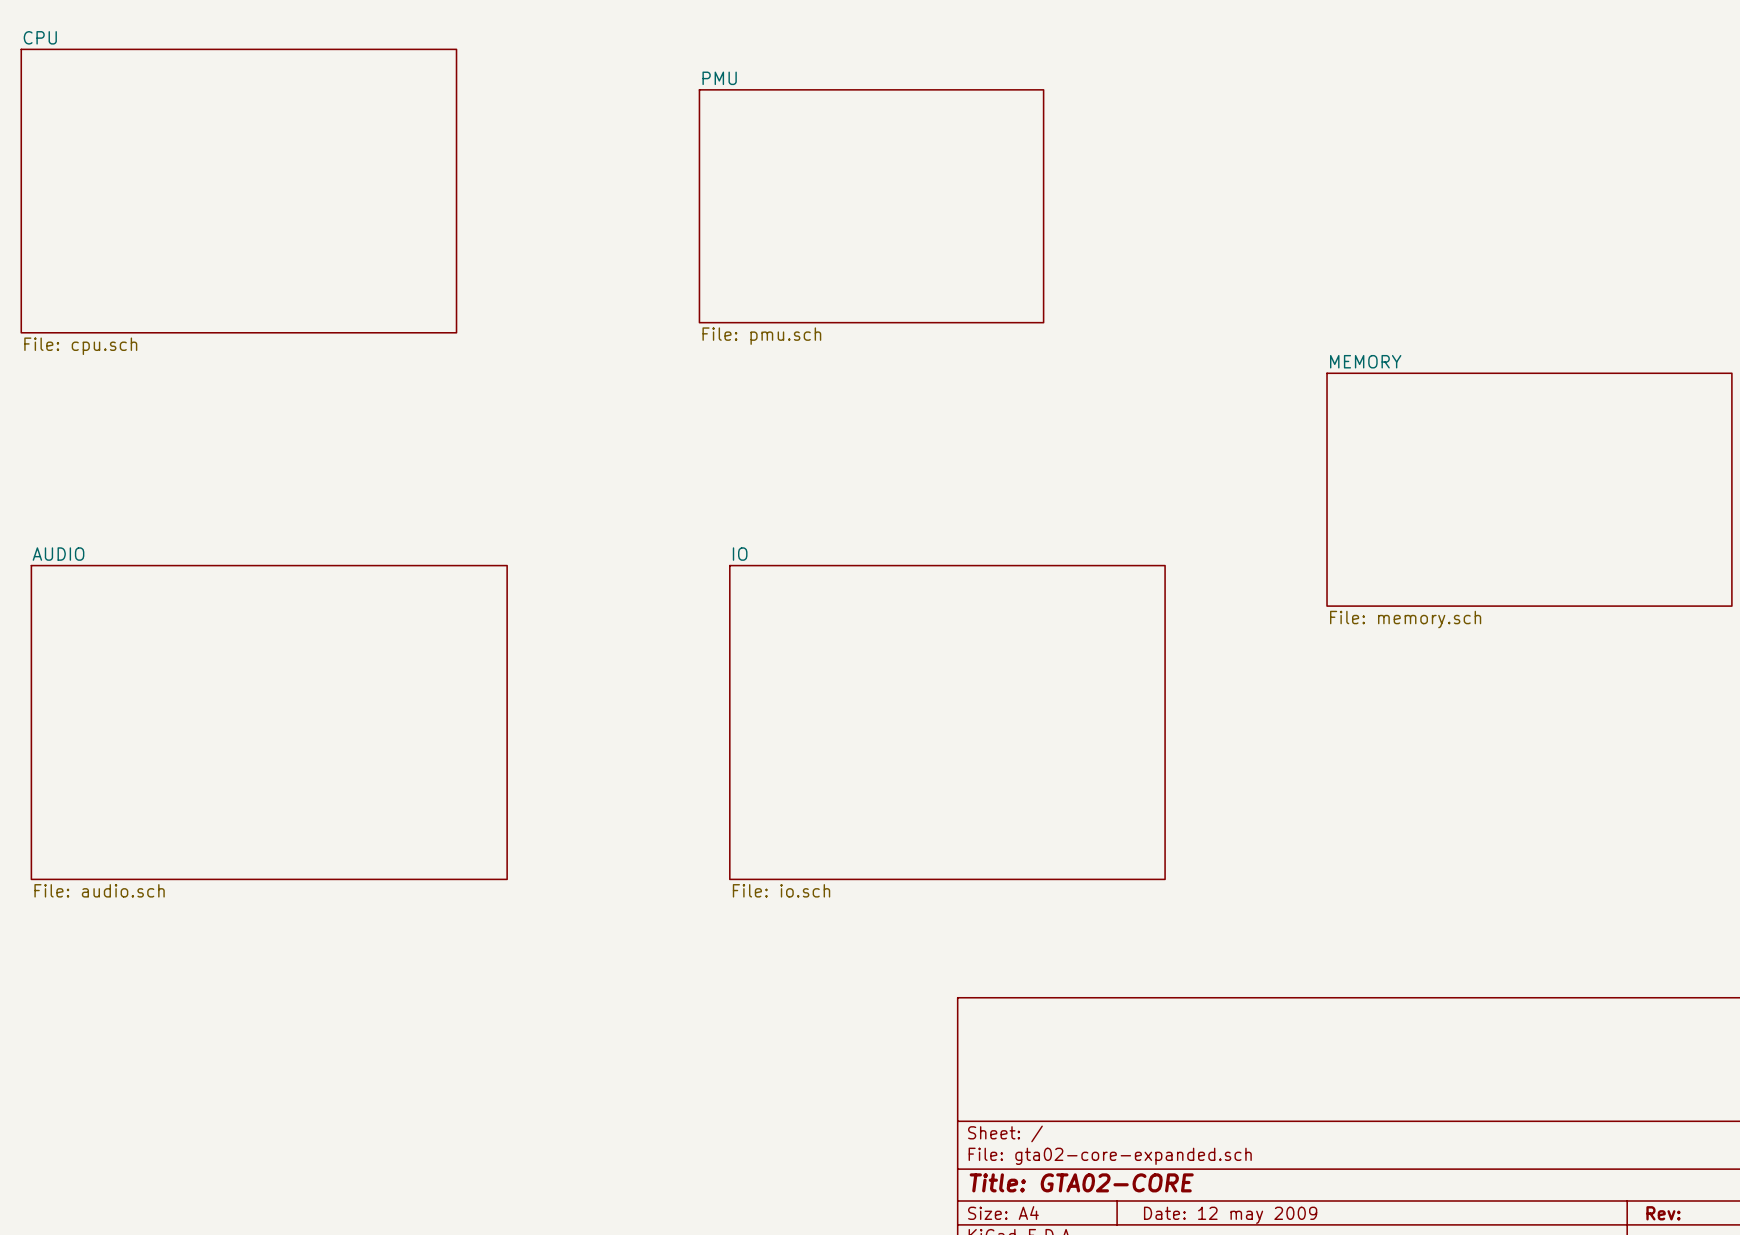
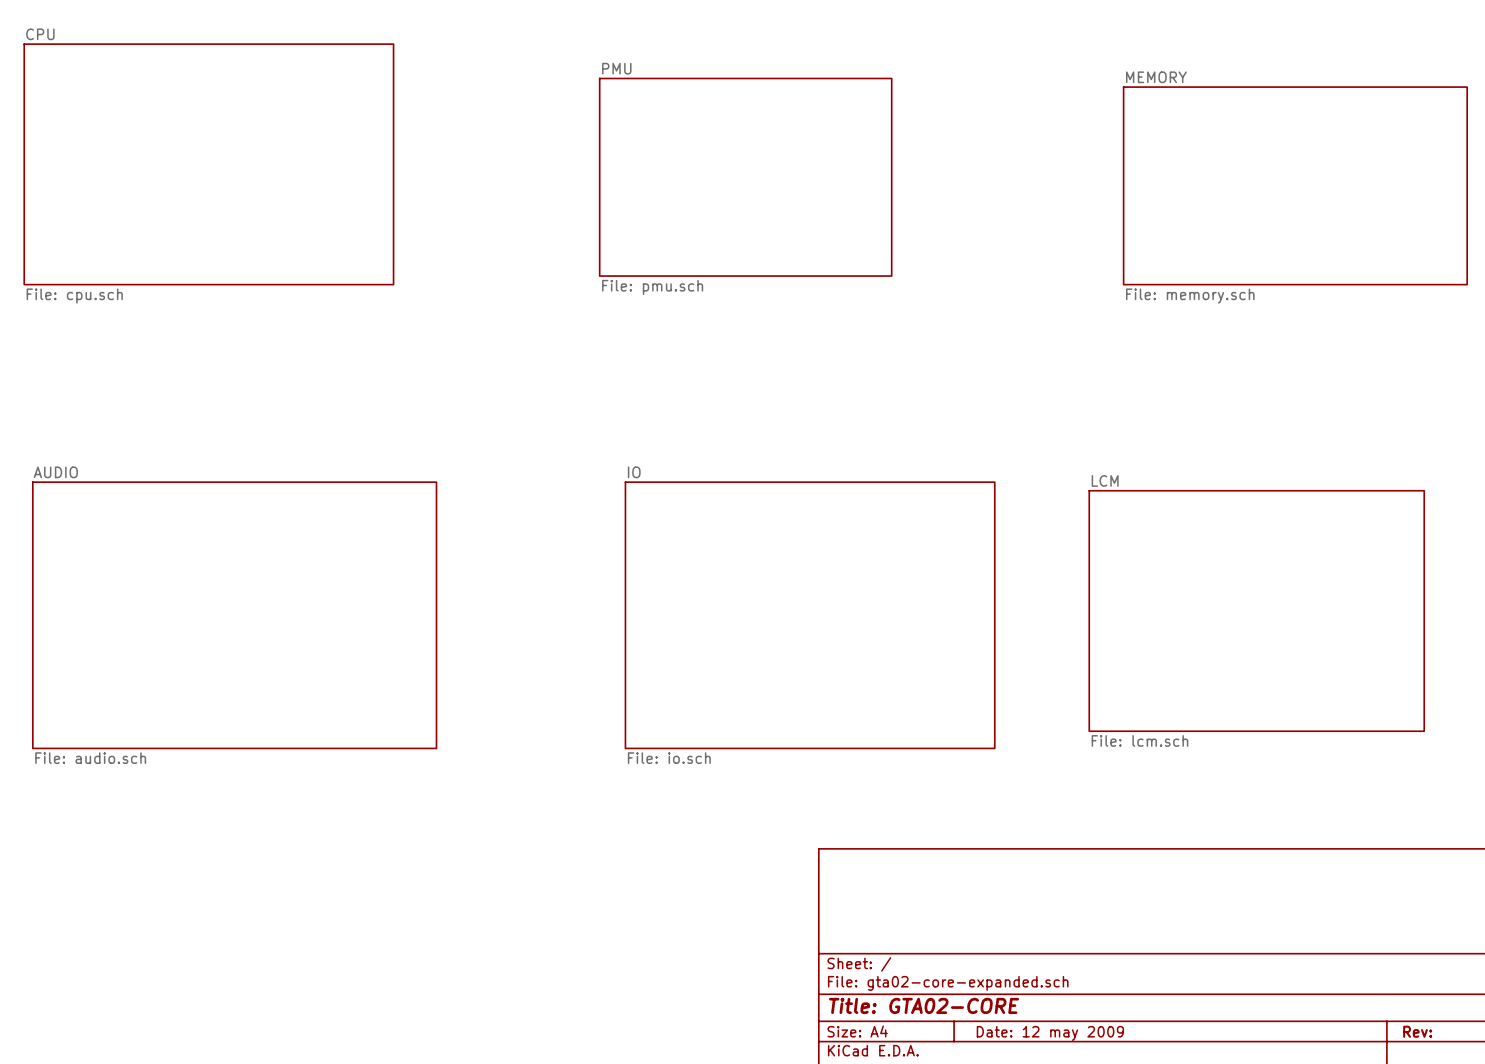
sheet MEMORY: none -> File: memory.sch (1295, 185)
sheet MEMORY: File: memory.sch (1529, 489) -> none
sheet LCM: none -> File: lcm.sch (1256, 611)

